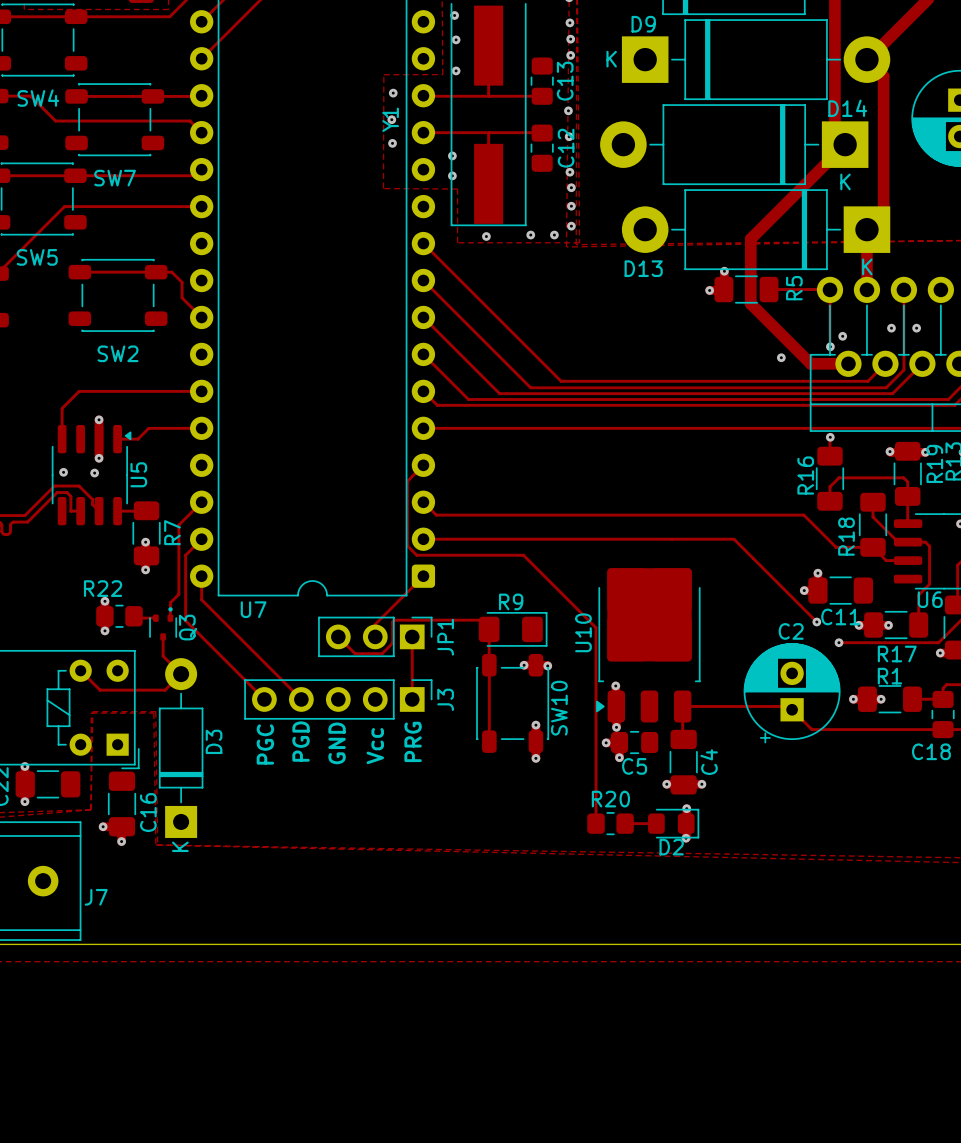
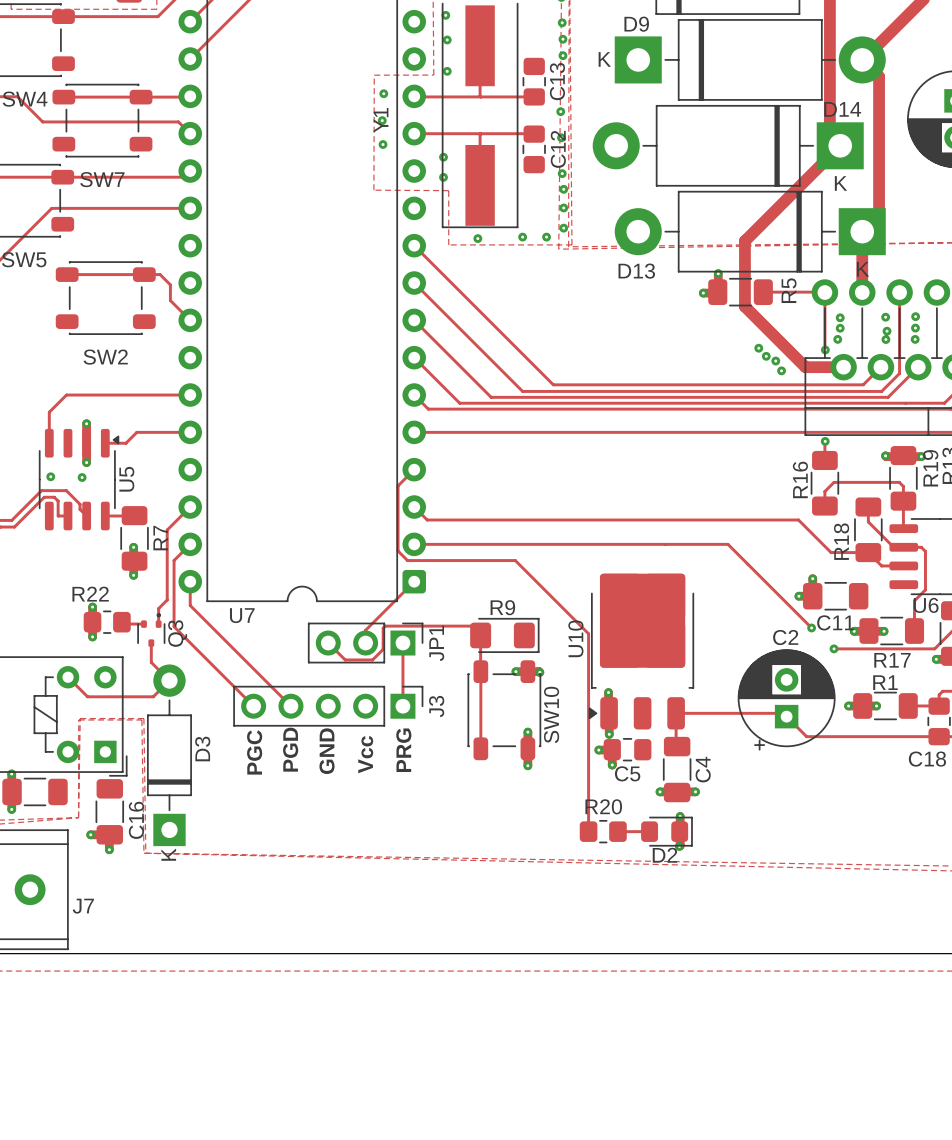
via: none -> (915, 316)
via: none -> (840, 317)
via: none -> (885, 317)
via: none -> (840, 328)
via: none -> (915, 328)
via: (916, 328) -> none
via: none -> (885, 339)
via: none -> (915, 339)
via: none -> (758, 348)
via: none -> (766, 356)
via: none -> (781, 370)

